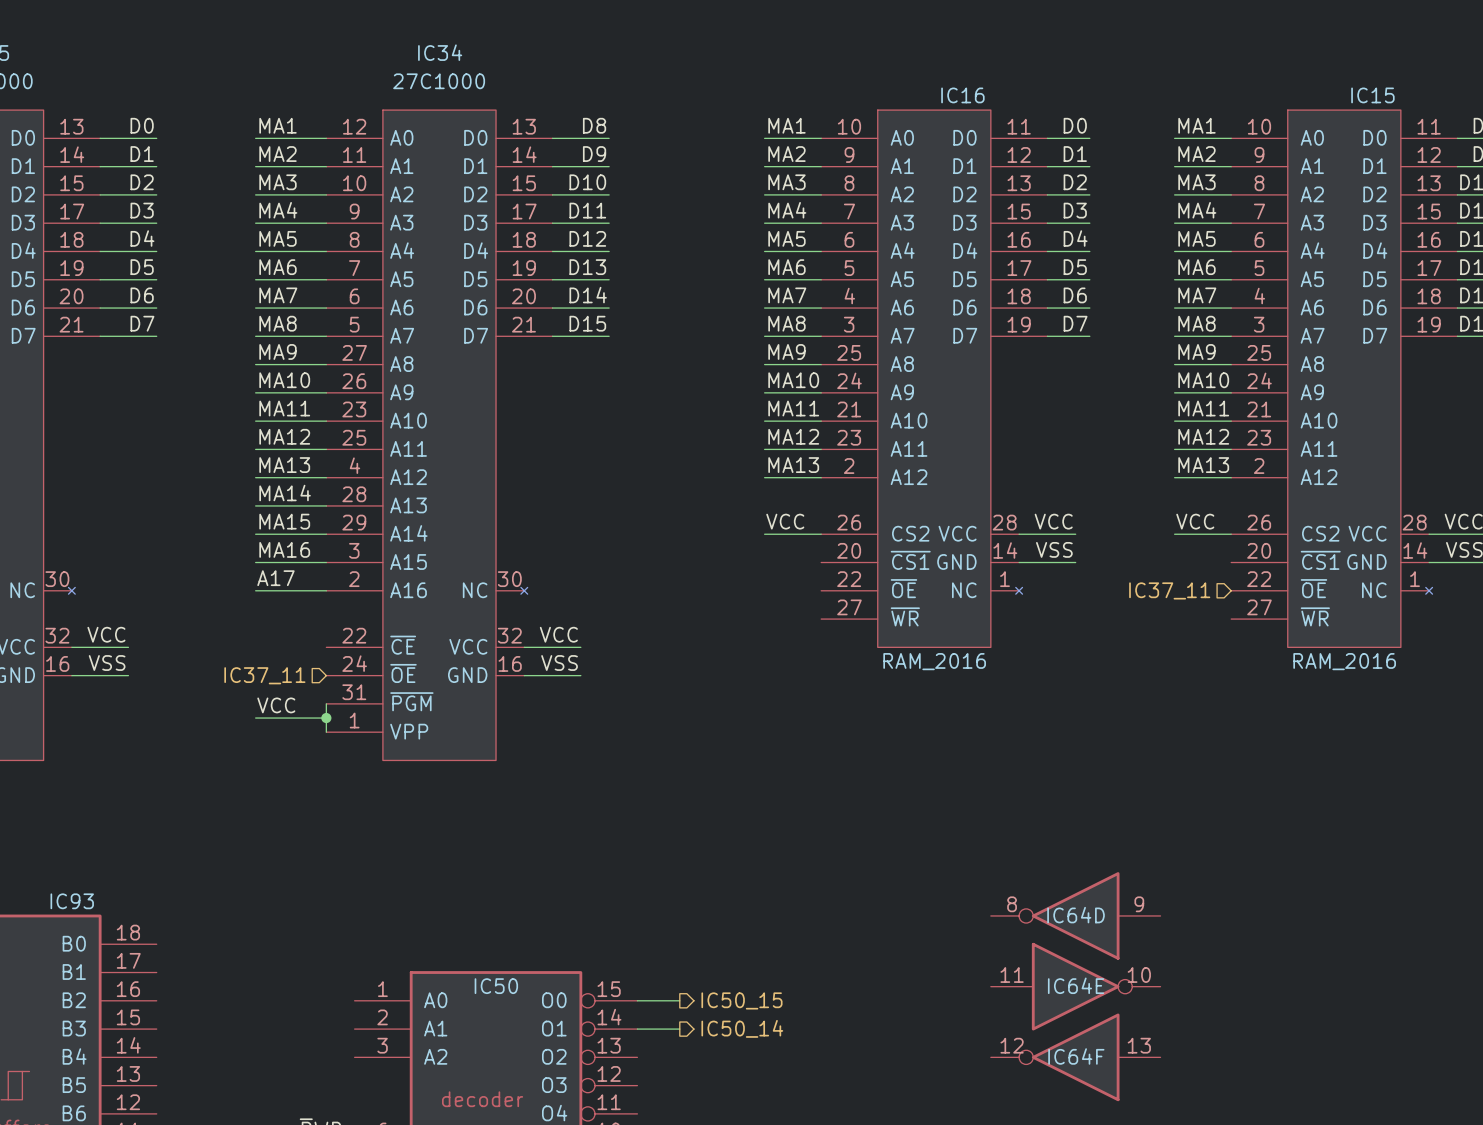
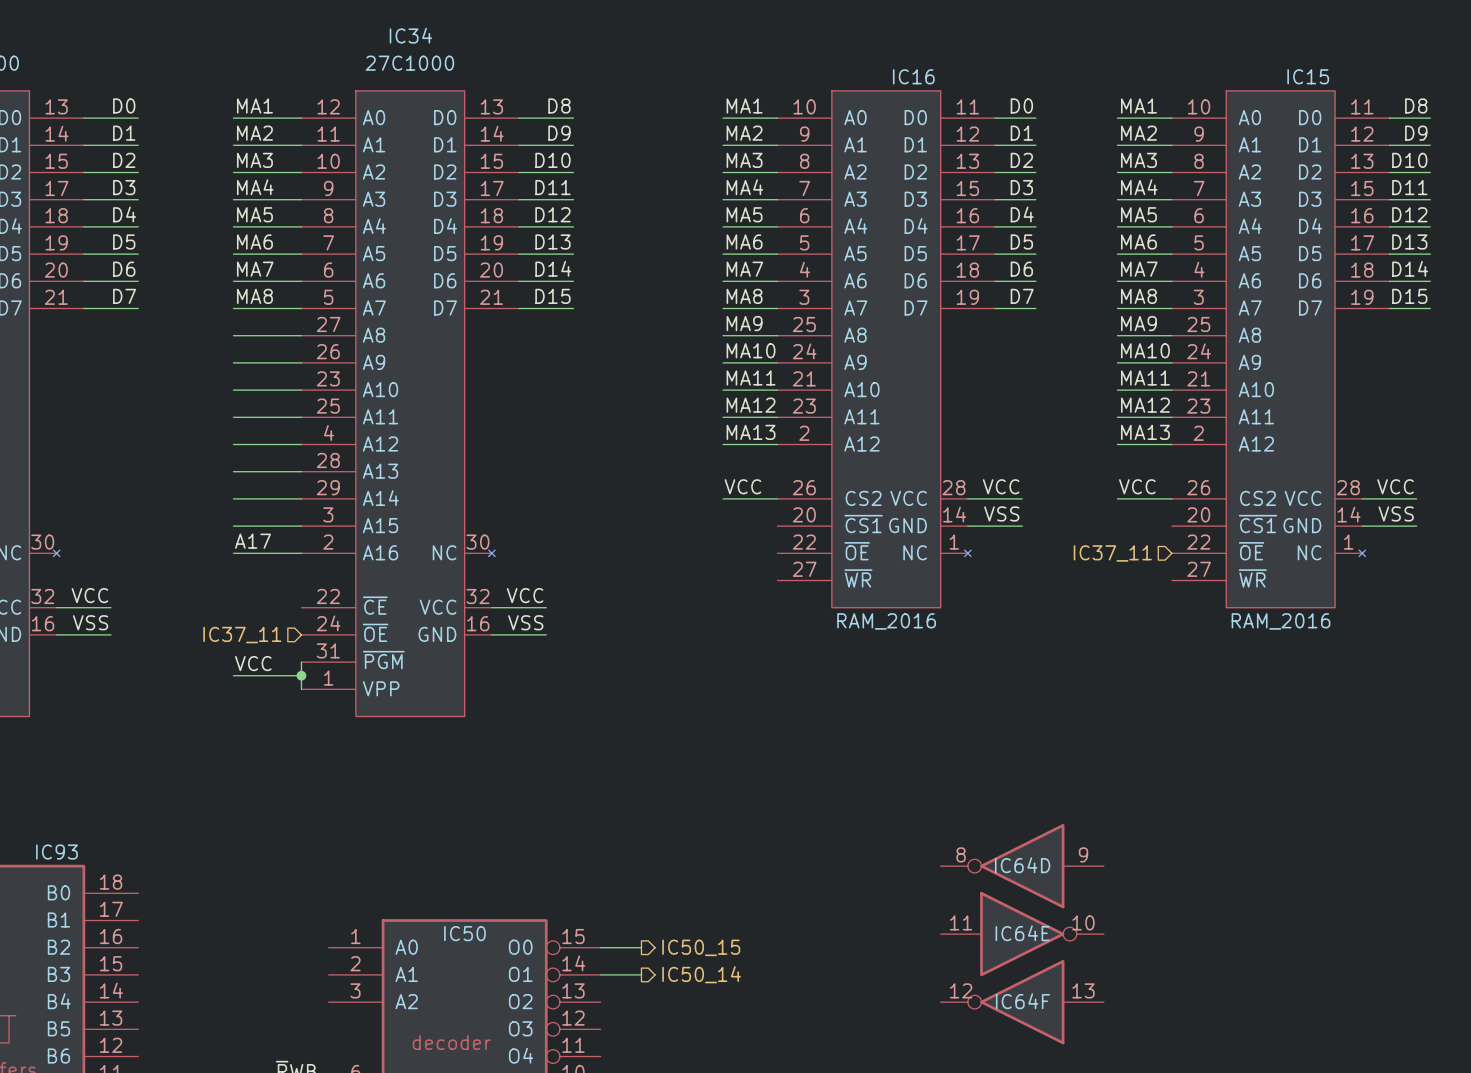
label: MA9 (277, 351) -> none
label: MA10 (284, 380) -> none
label: MA11 (284, 408) -> none
label: MA12 (284, 436) -> none
label: MA13 (284, 465) -> none
label: MA14 (285, 493) -> none
label: MA15 (284, 521) -> none
label: MA16 (284, 549) -> none

